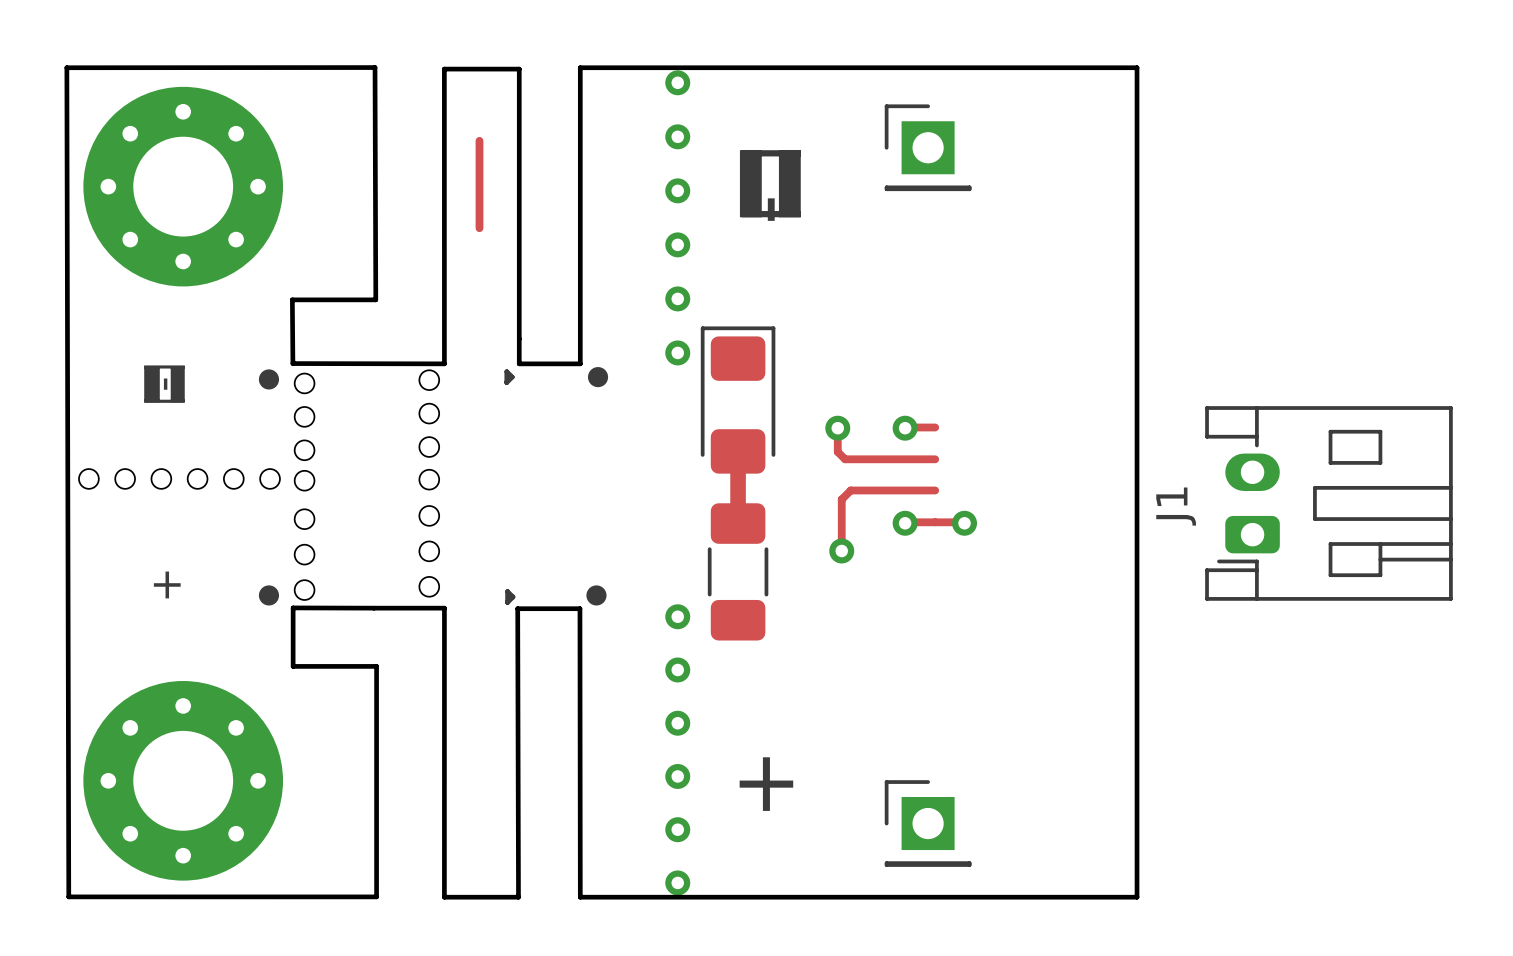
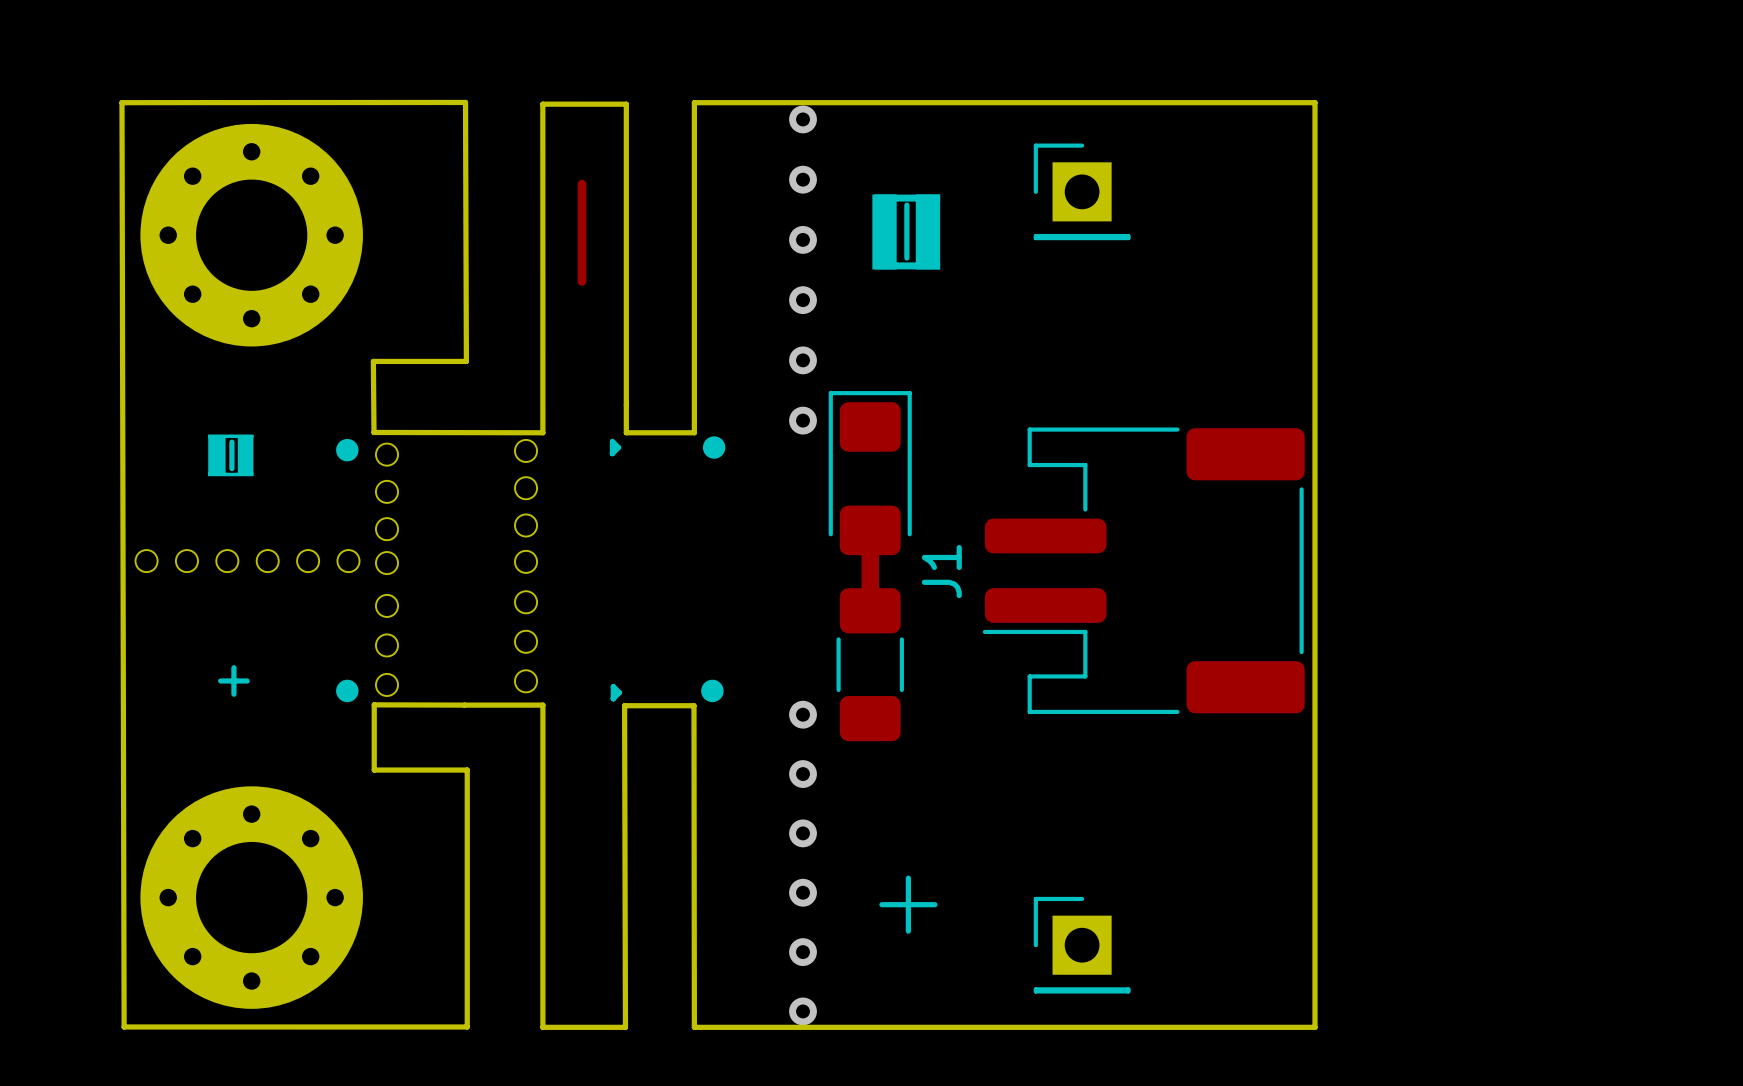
J1 footprint: [1205, 406, 1453, 601] -> [982, 427, 1305, 714]
track: (935, 427) (905, 428) -> none
track: (837, 428) (837, 451) (845, 459) (935, 459) -> none
via: (837, 428) -> none
via: (905, 428) -> none
track: (935, 490) (850, 490) (841, 499) (841, 550) -> none
track: (905, 523) (964, 523) -> none
via: (905, 523) -> none
via: (964, 523) -> none
via: (841, 550) -> none

